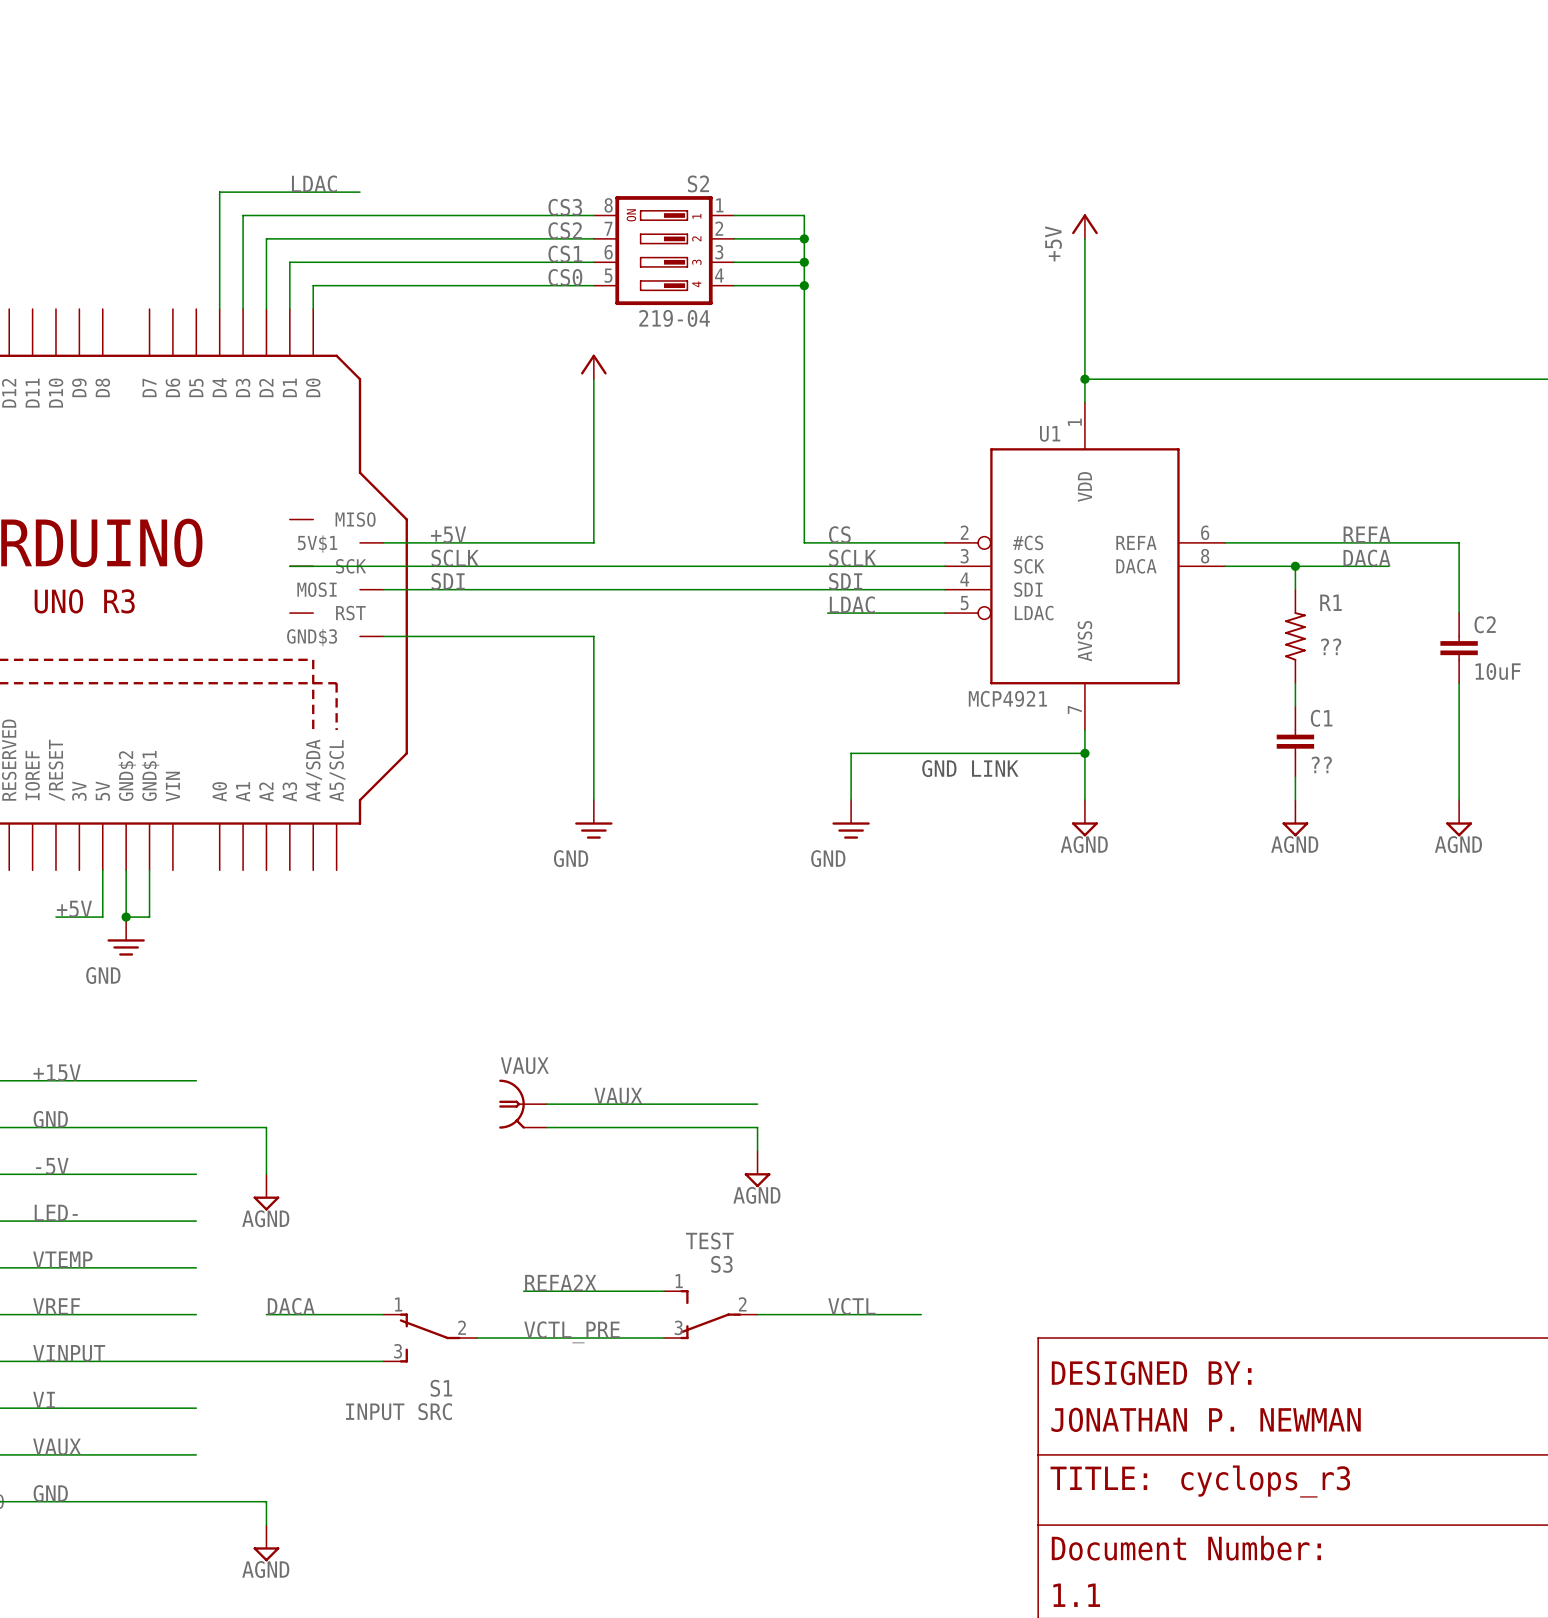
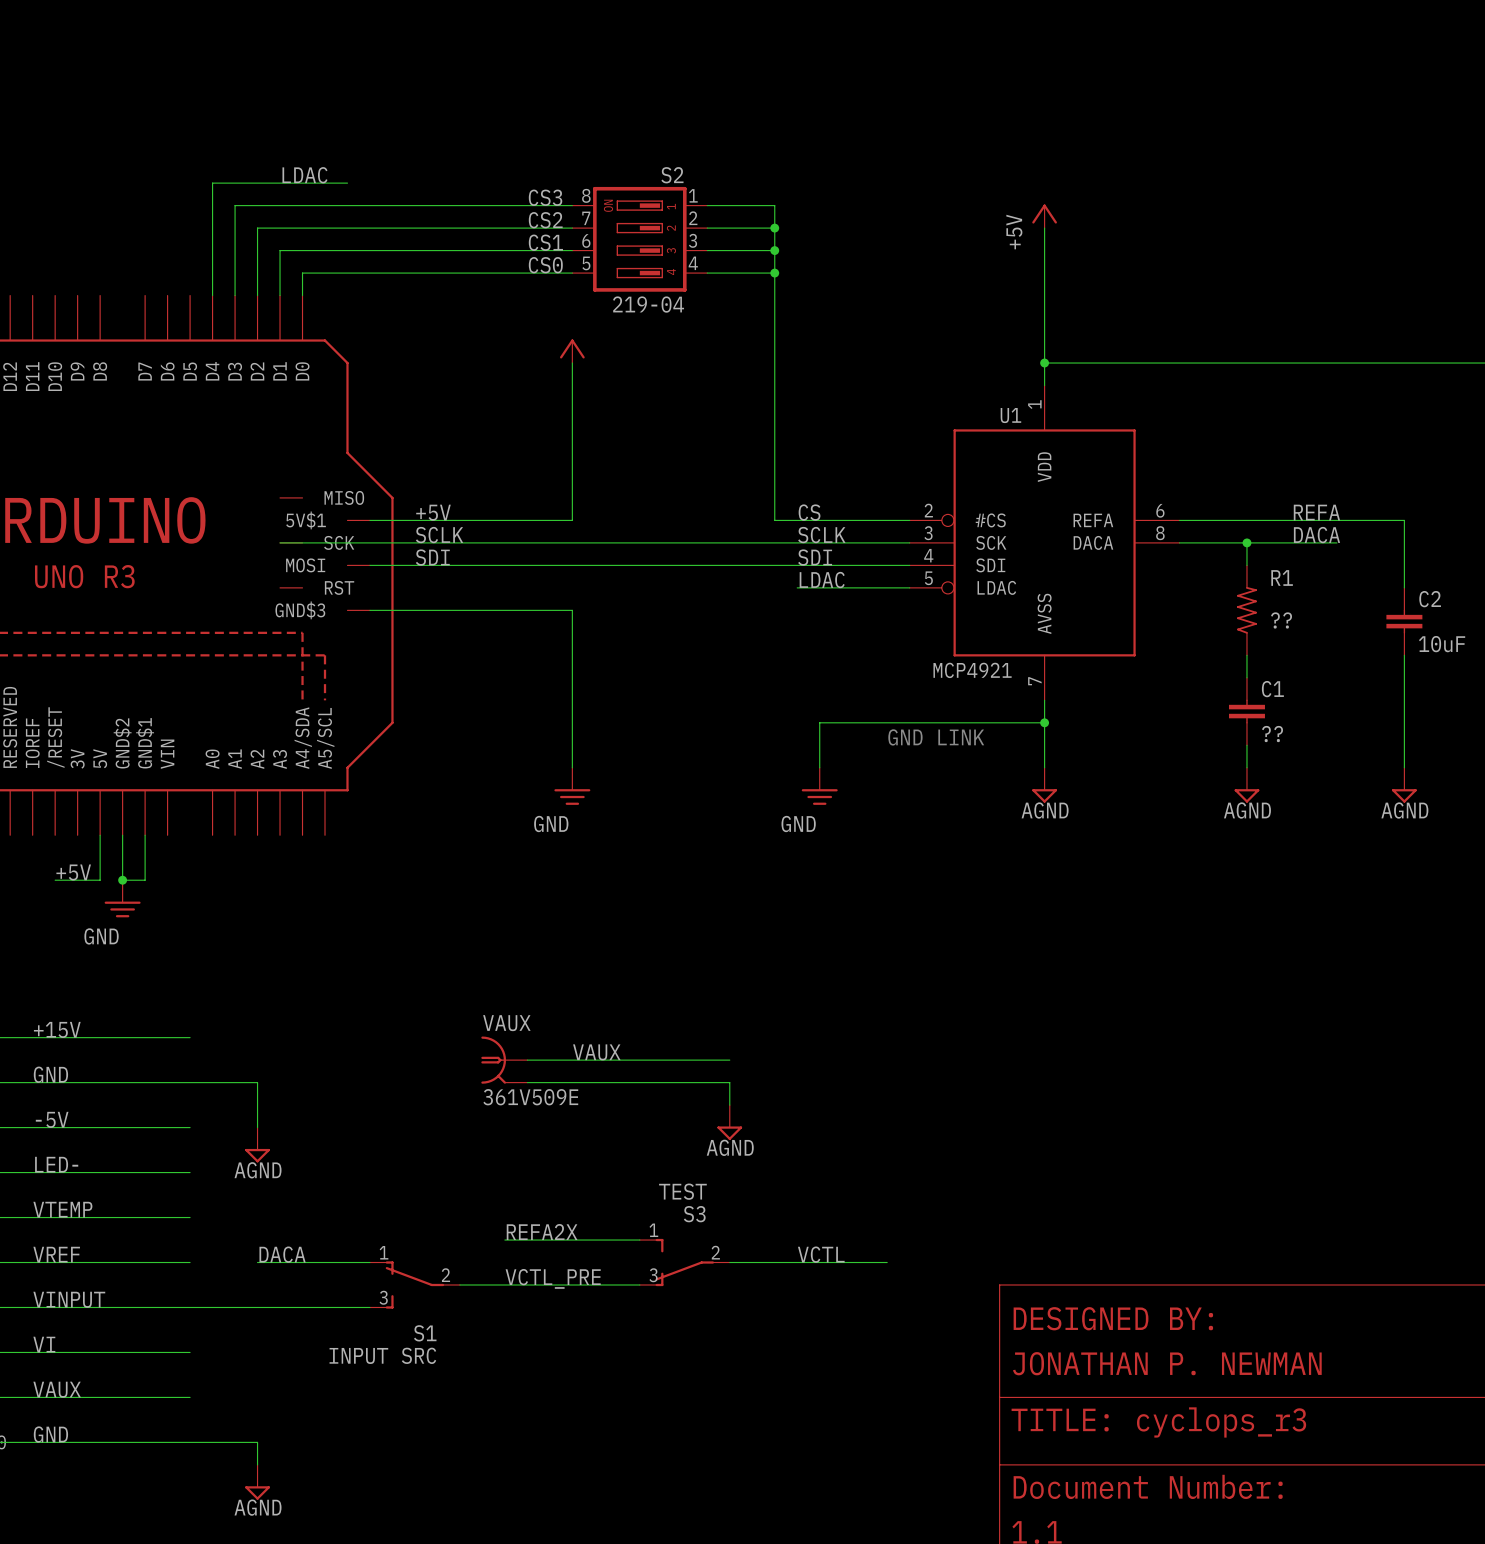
VAUX value: none -> 361V509E (530, 1097)

